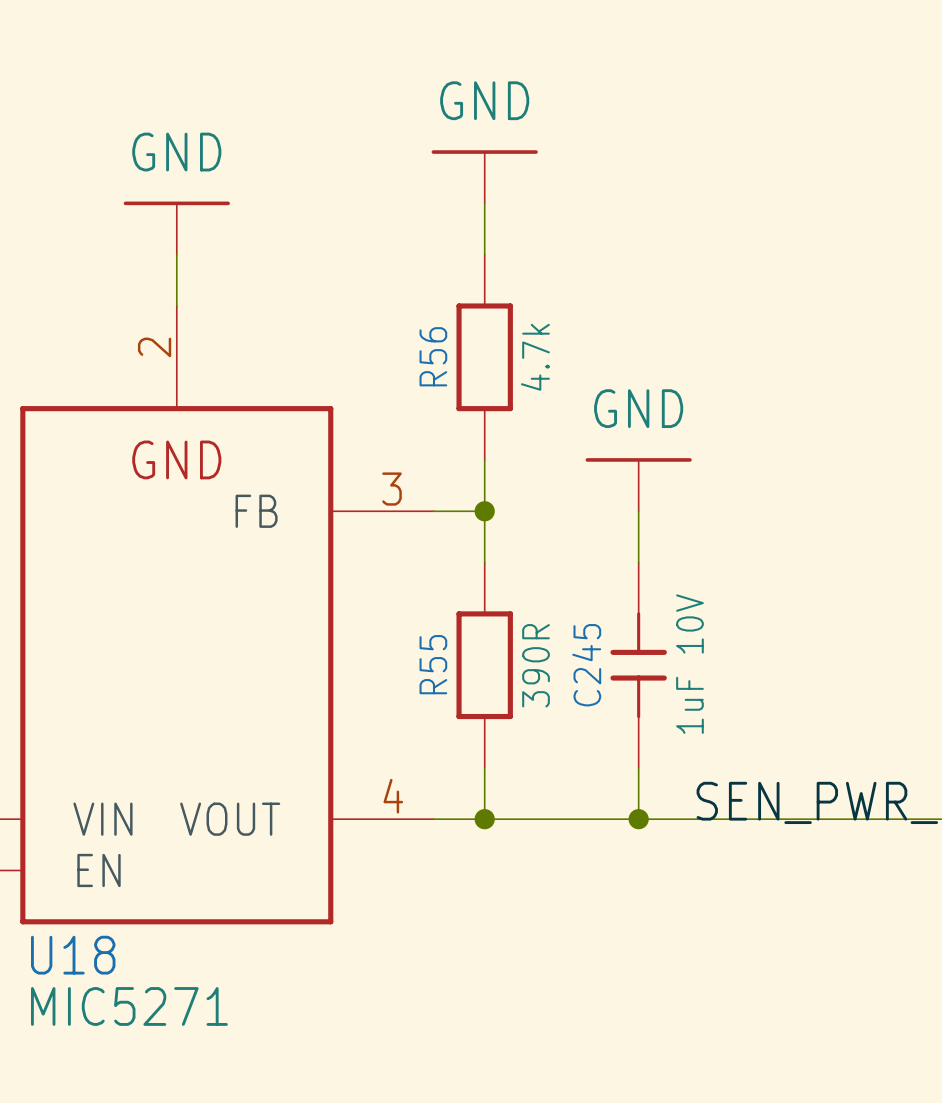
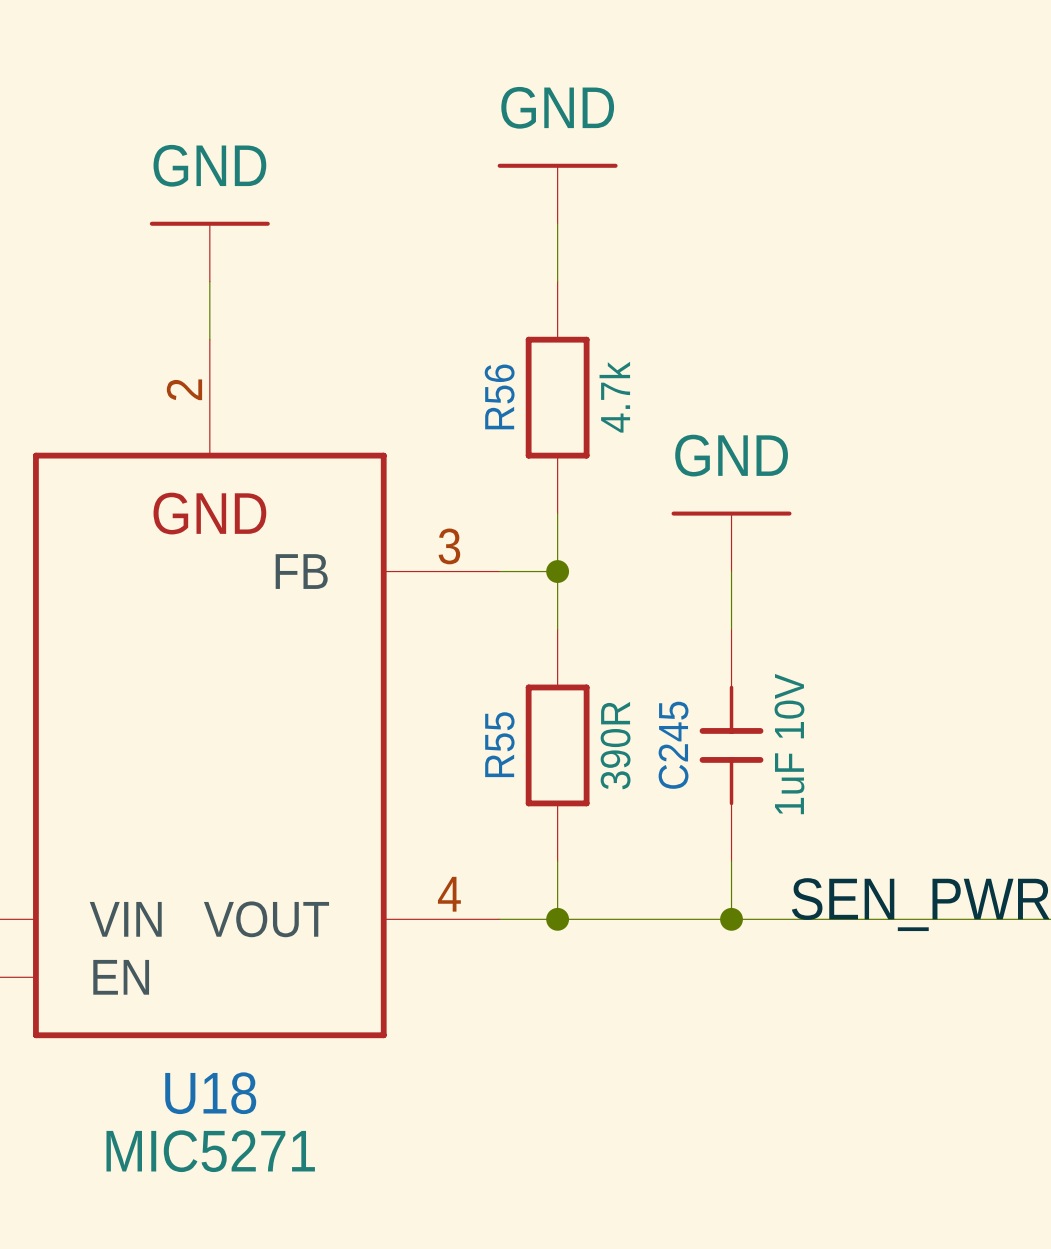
U18 name position: U18 (73, 955) -> U18 (210, 1093)
U18 value position: MIC5271 (129, 1006) -> MIC5271 (210, 1151)

